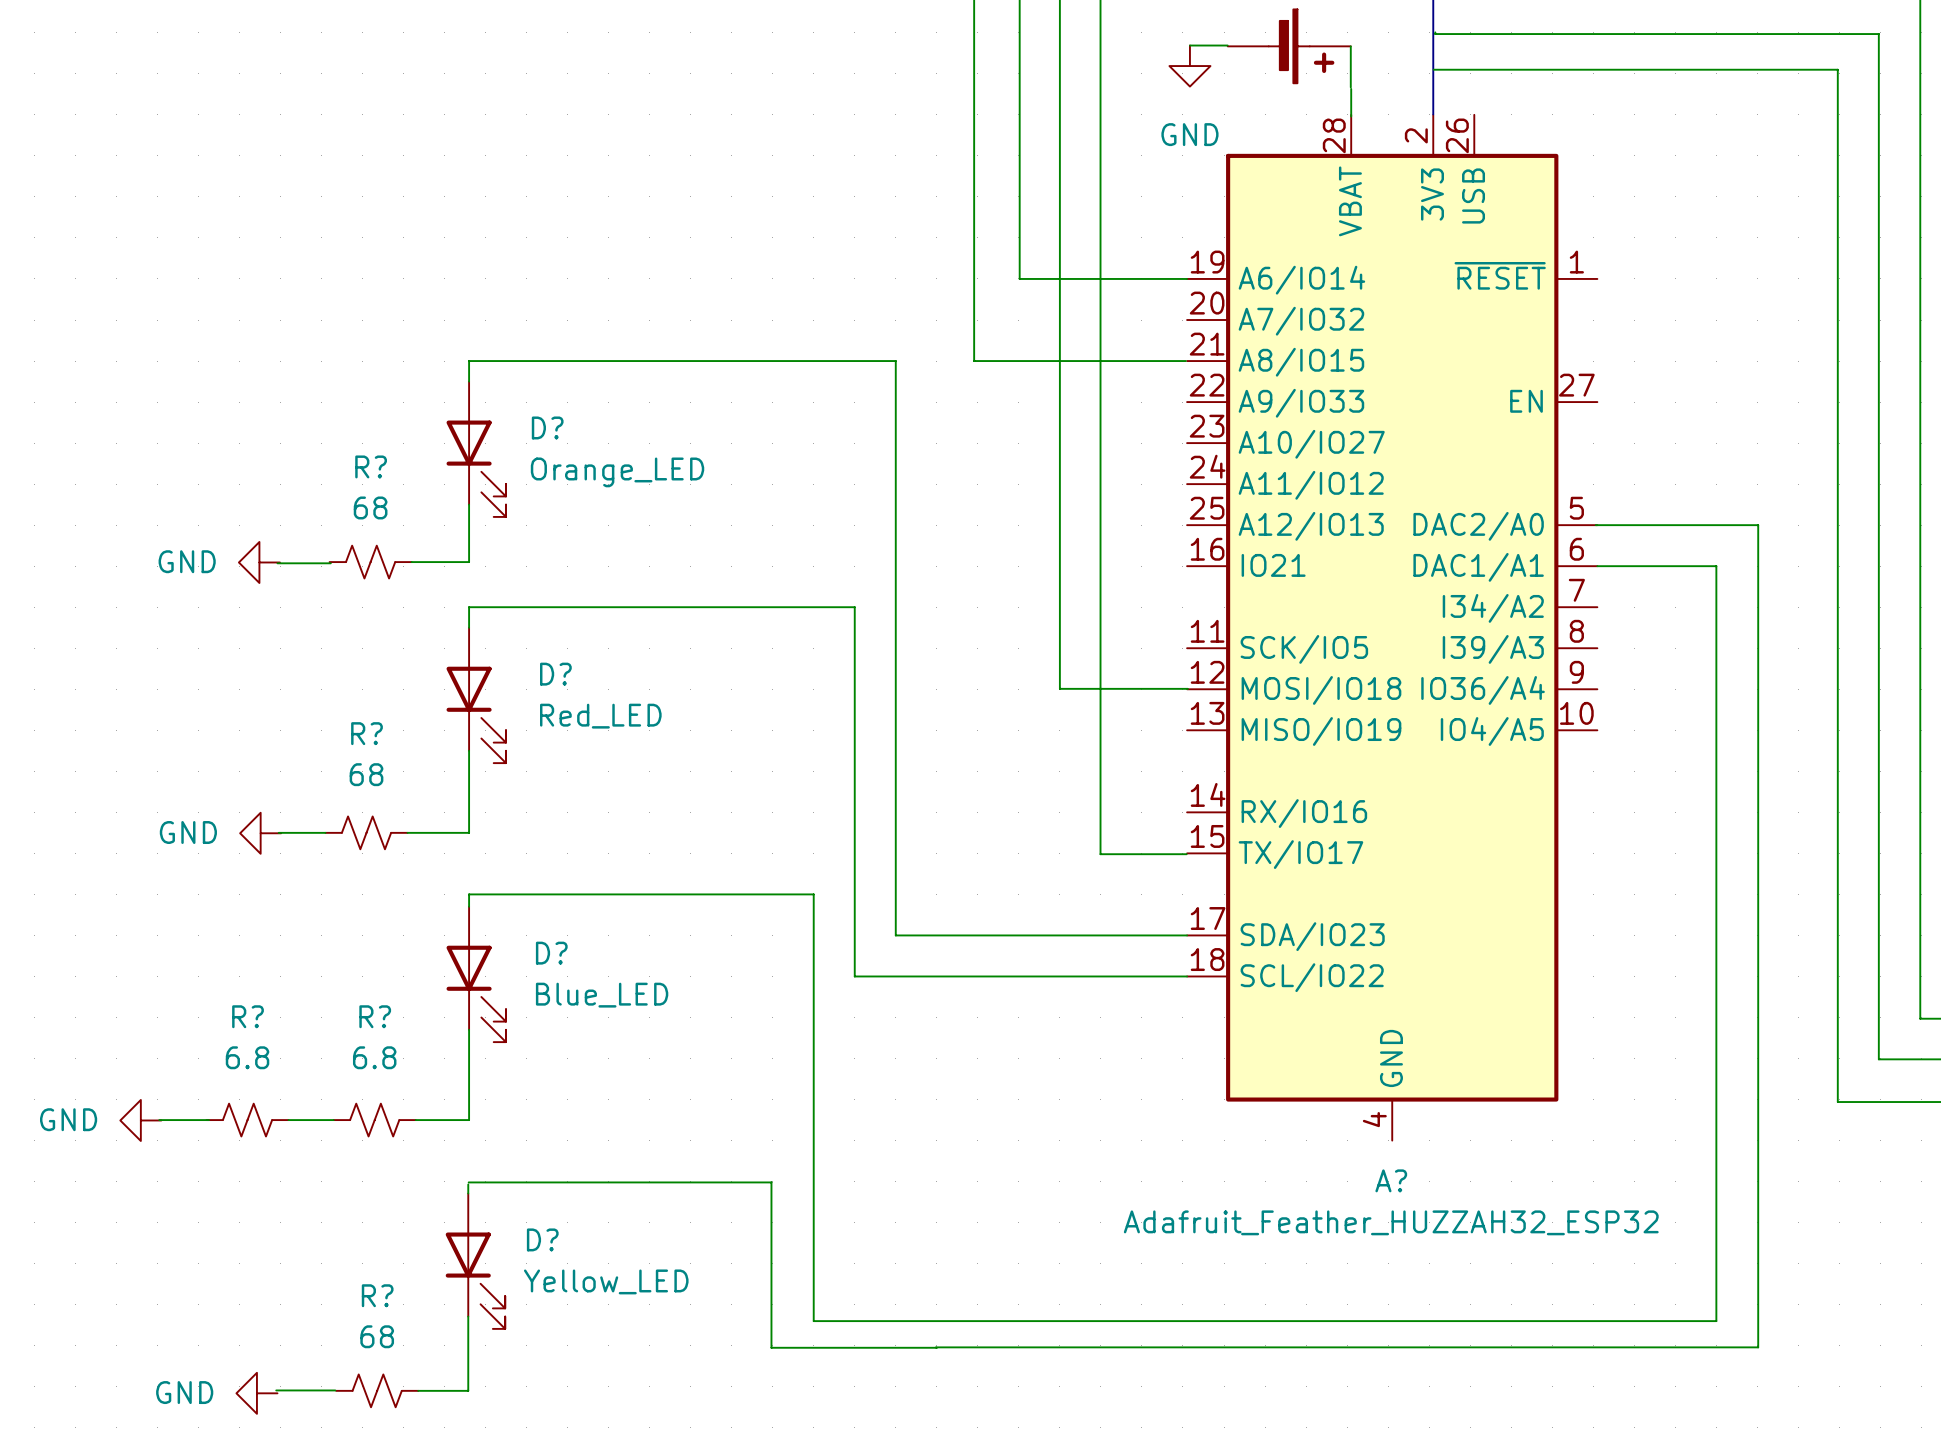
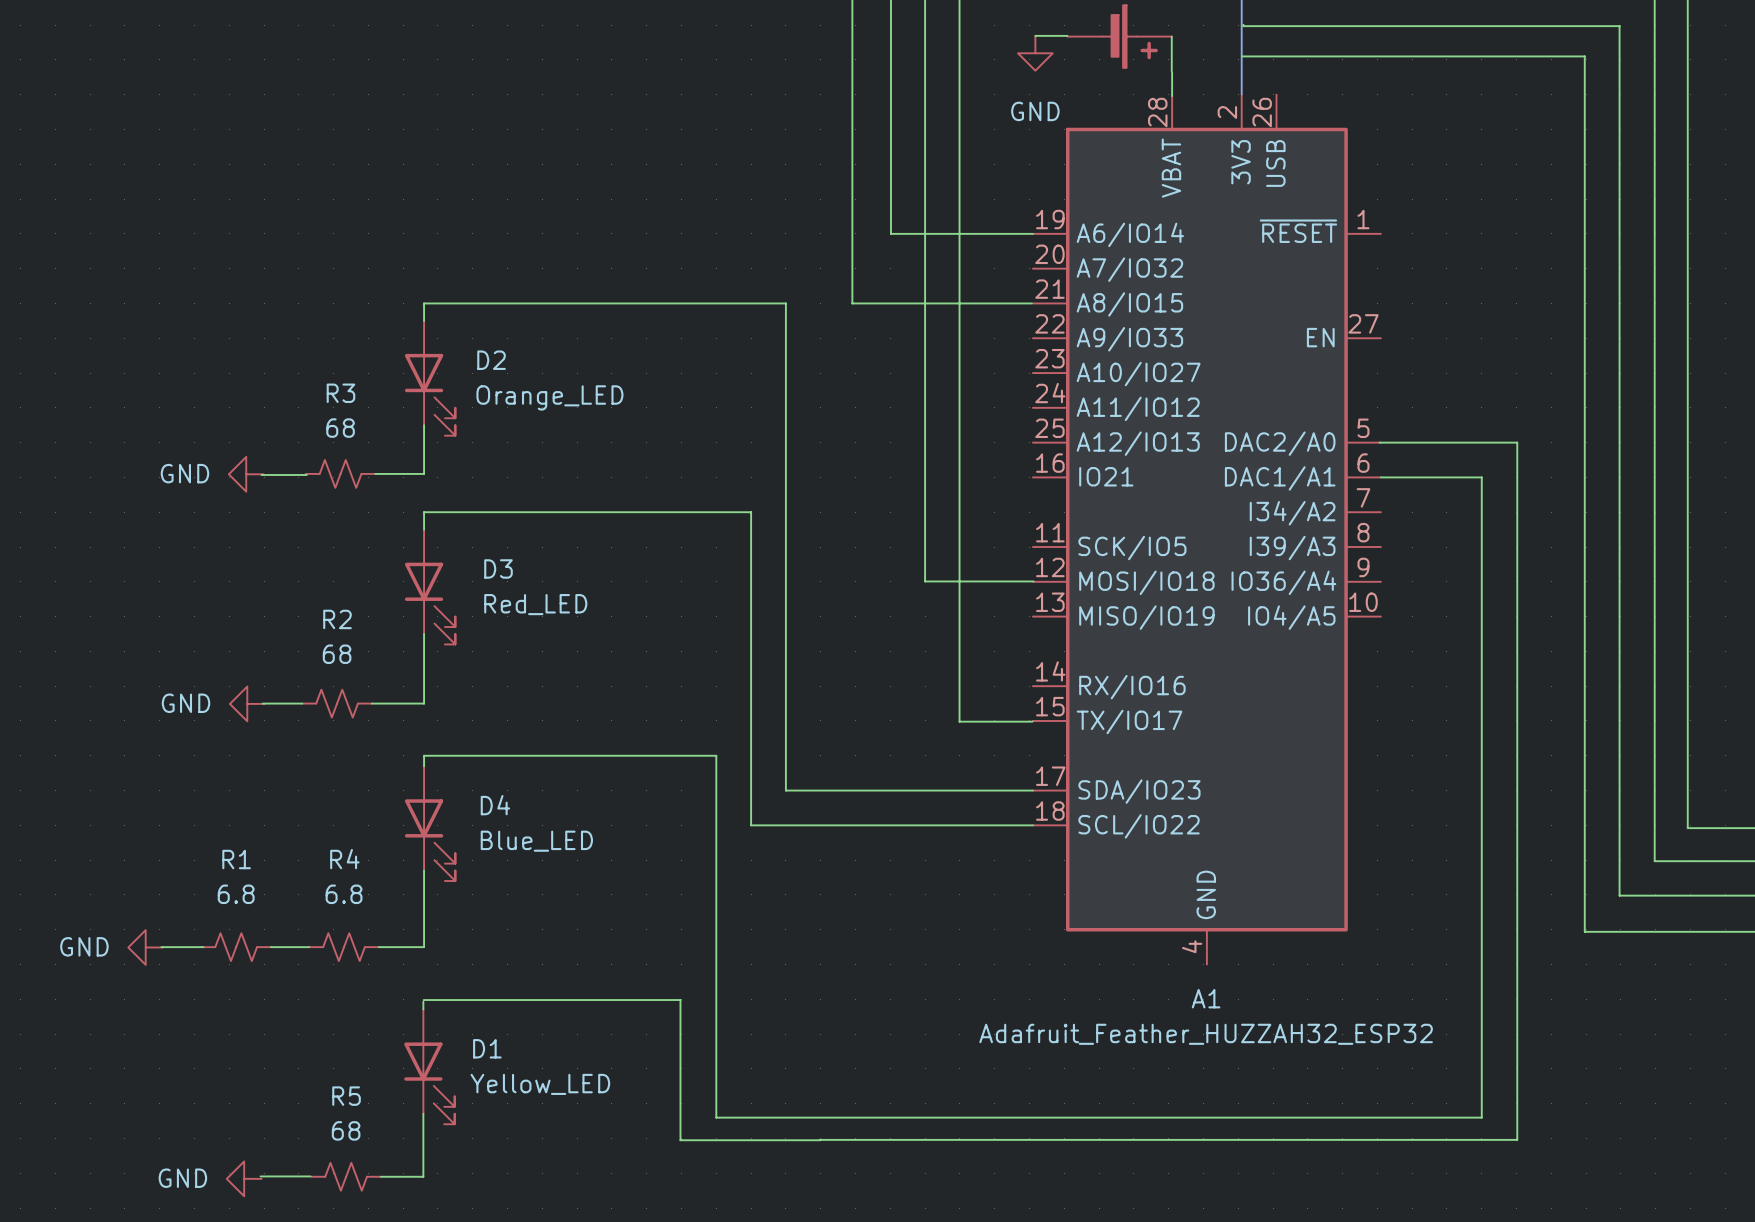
D? name: D? (547, 427) -> D2 (491, 360)
R? name: R? (371, 466) -> R3 (340, 393)
D? name: D? (555, 674) -> D3 (498, 568)
R? name: R? (367, 733) -> R2 (337, 619)
D? name: D? (551, 953) -> D4 (495, 805)
R? name: R? (248, 1016) -> R1 (236, 859)
R? name: R? (375, 1016) -> R4 (344, 859)
A? name: A? (1391, 1180) -> A1 (1206, 998)
D? name: D? (542, 1239) -> D1 (487, 1048)
R? name: R? (377, 1295) -> R5 (346, 1096)

